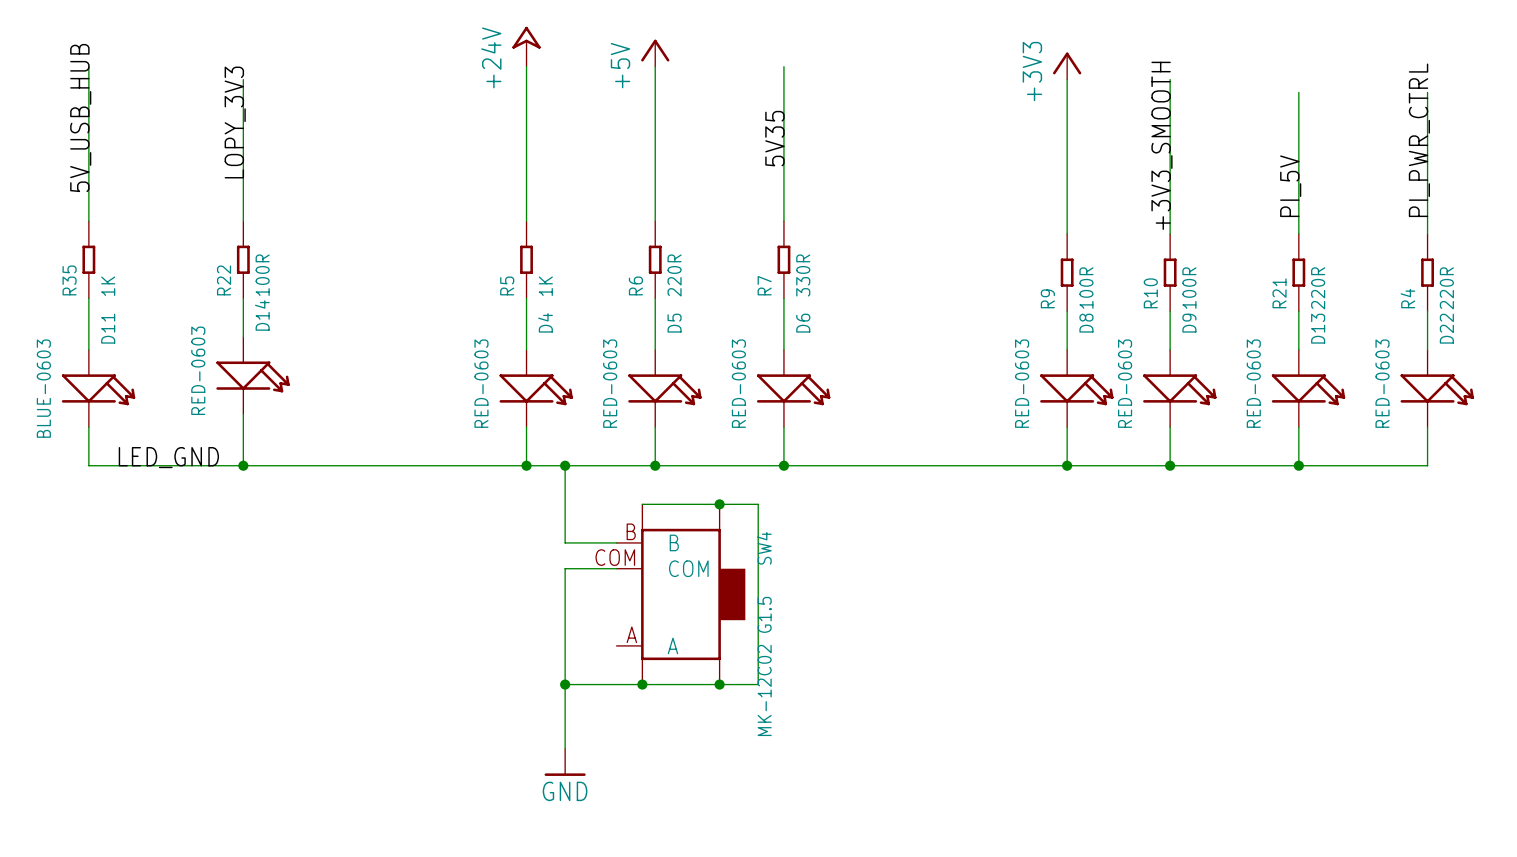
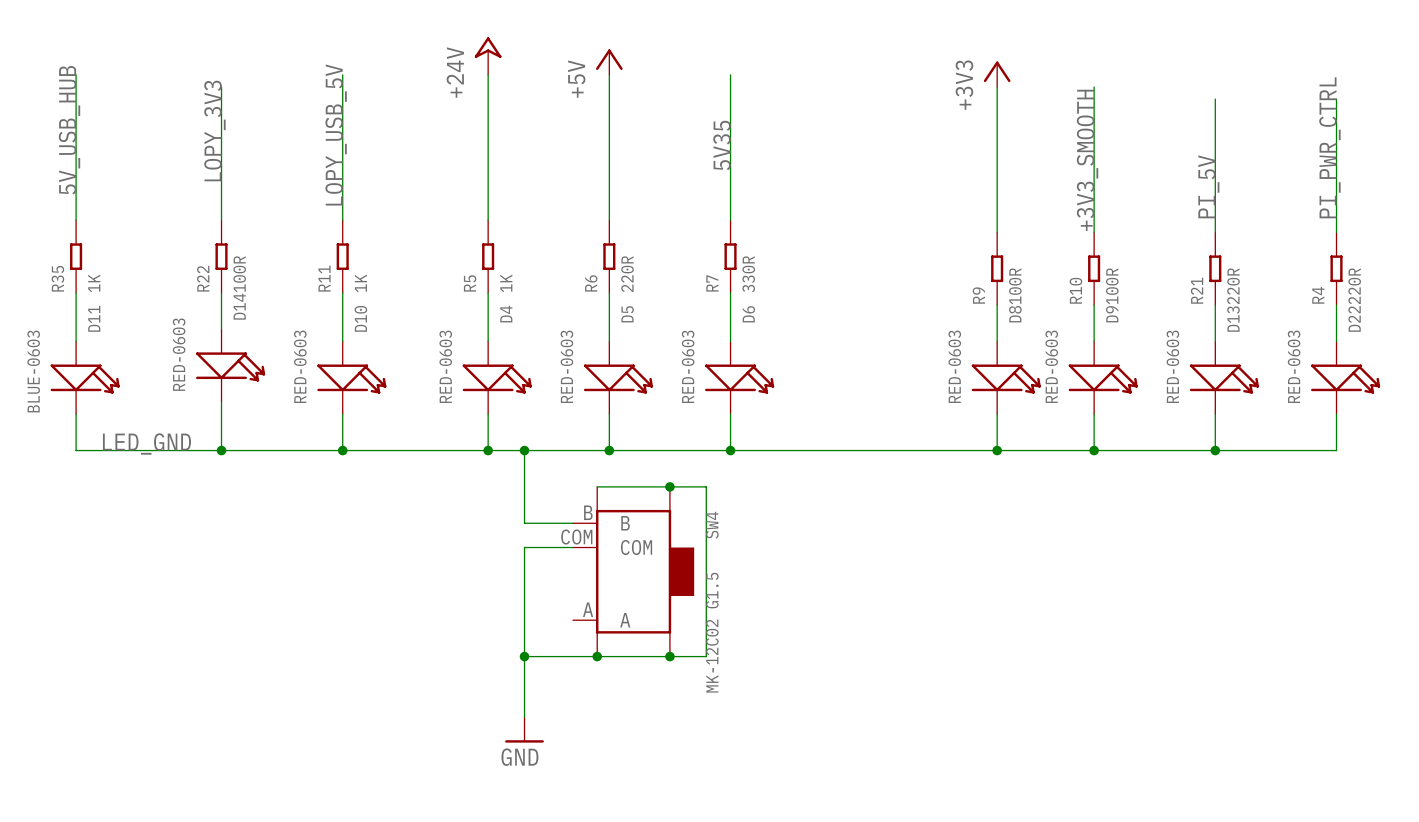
wire: none -> (342, 74) (342, 220)
label: none -> LOPY_USB_5V (336, 135)
R11: none -> 1K (342, 256)
wire: none -> (342, 293) (342, 341)
D10: none -> RED-0603 (351, 377)
wire: none -> (342, 414) (342, 450)
junction: none -> (342, 450)

